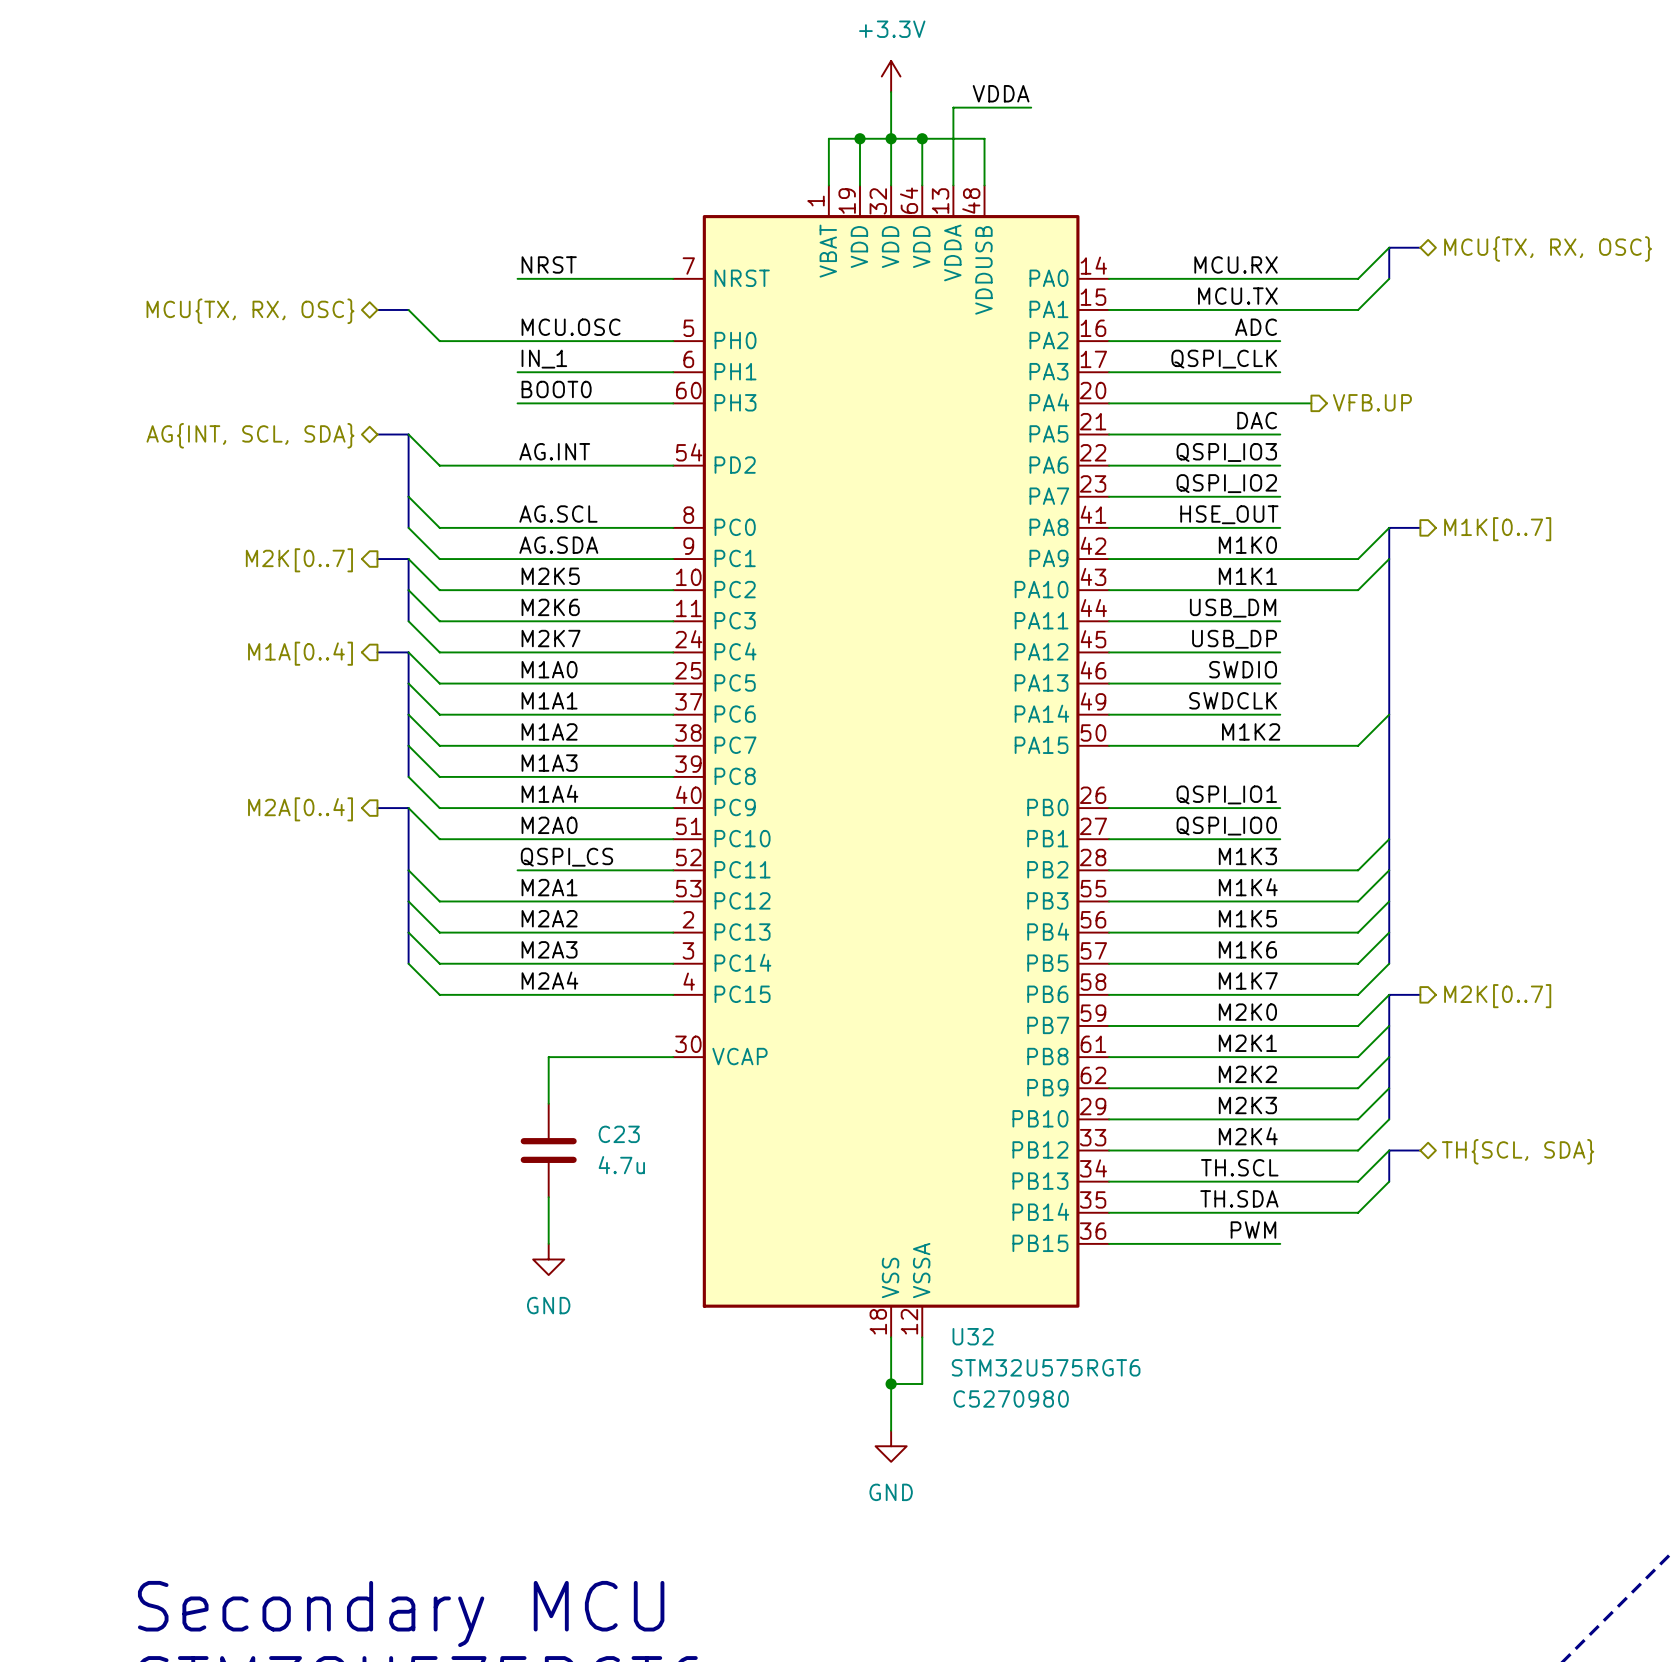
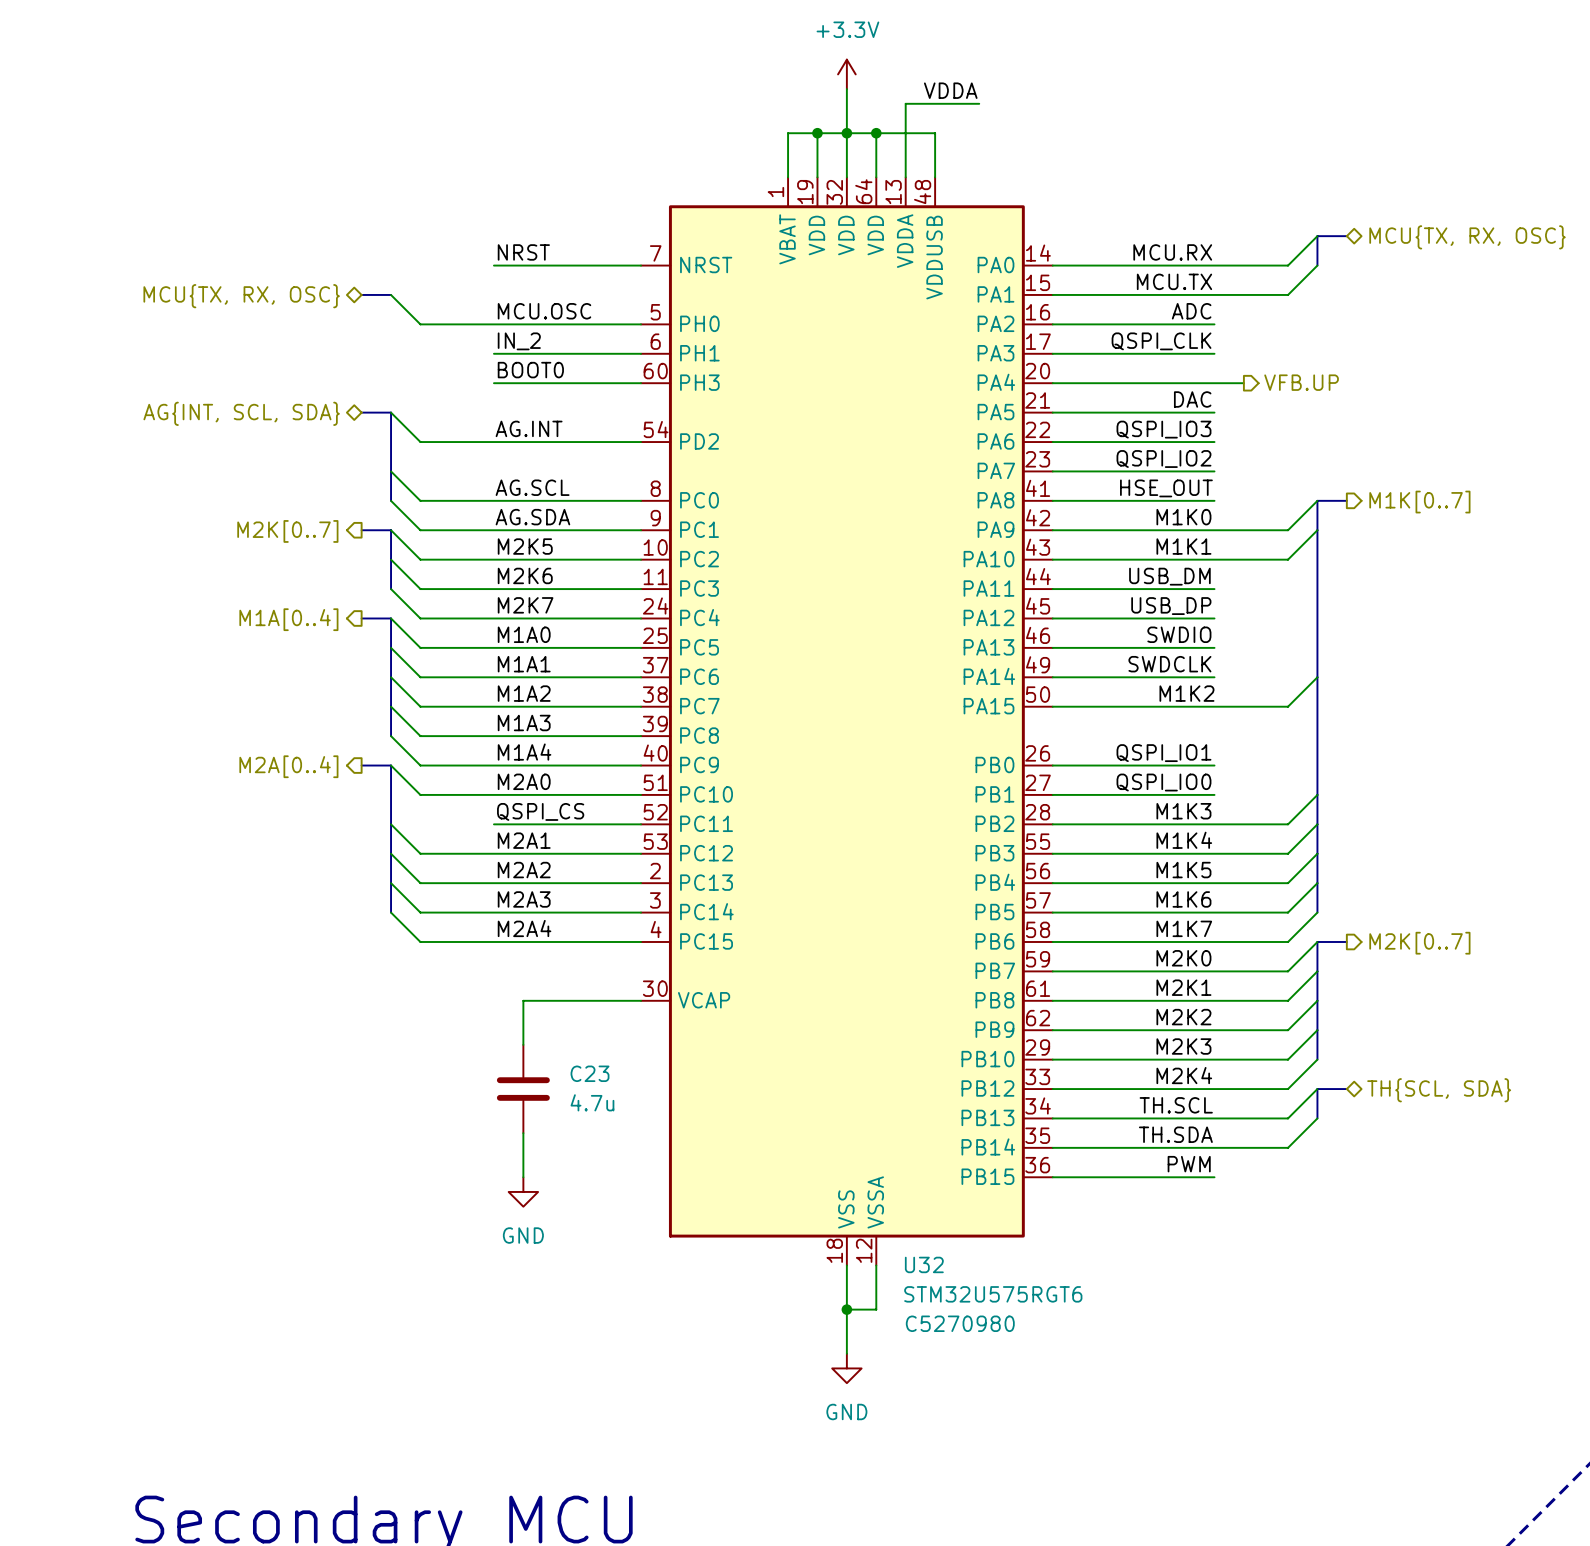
label: IN_1 (544, 359) -> IN_2 (519, 341)

